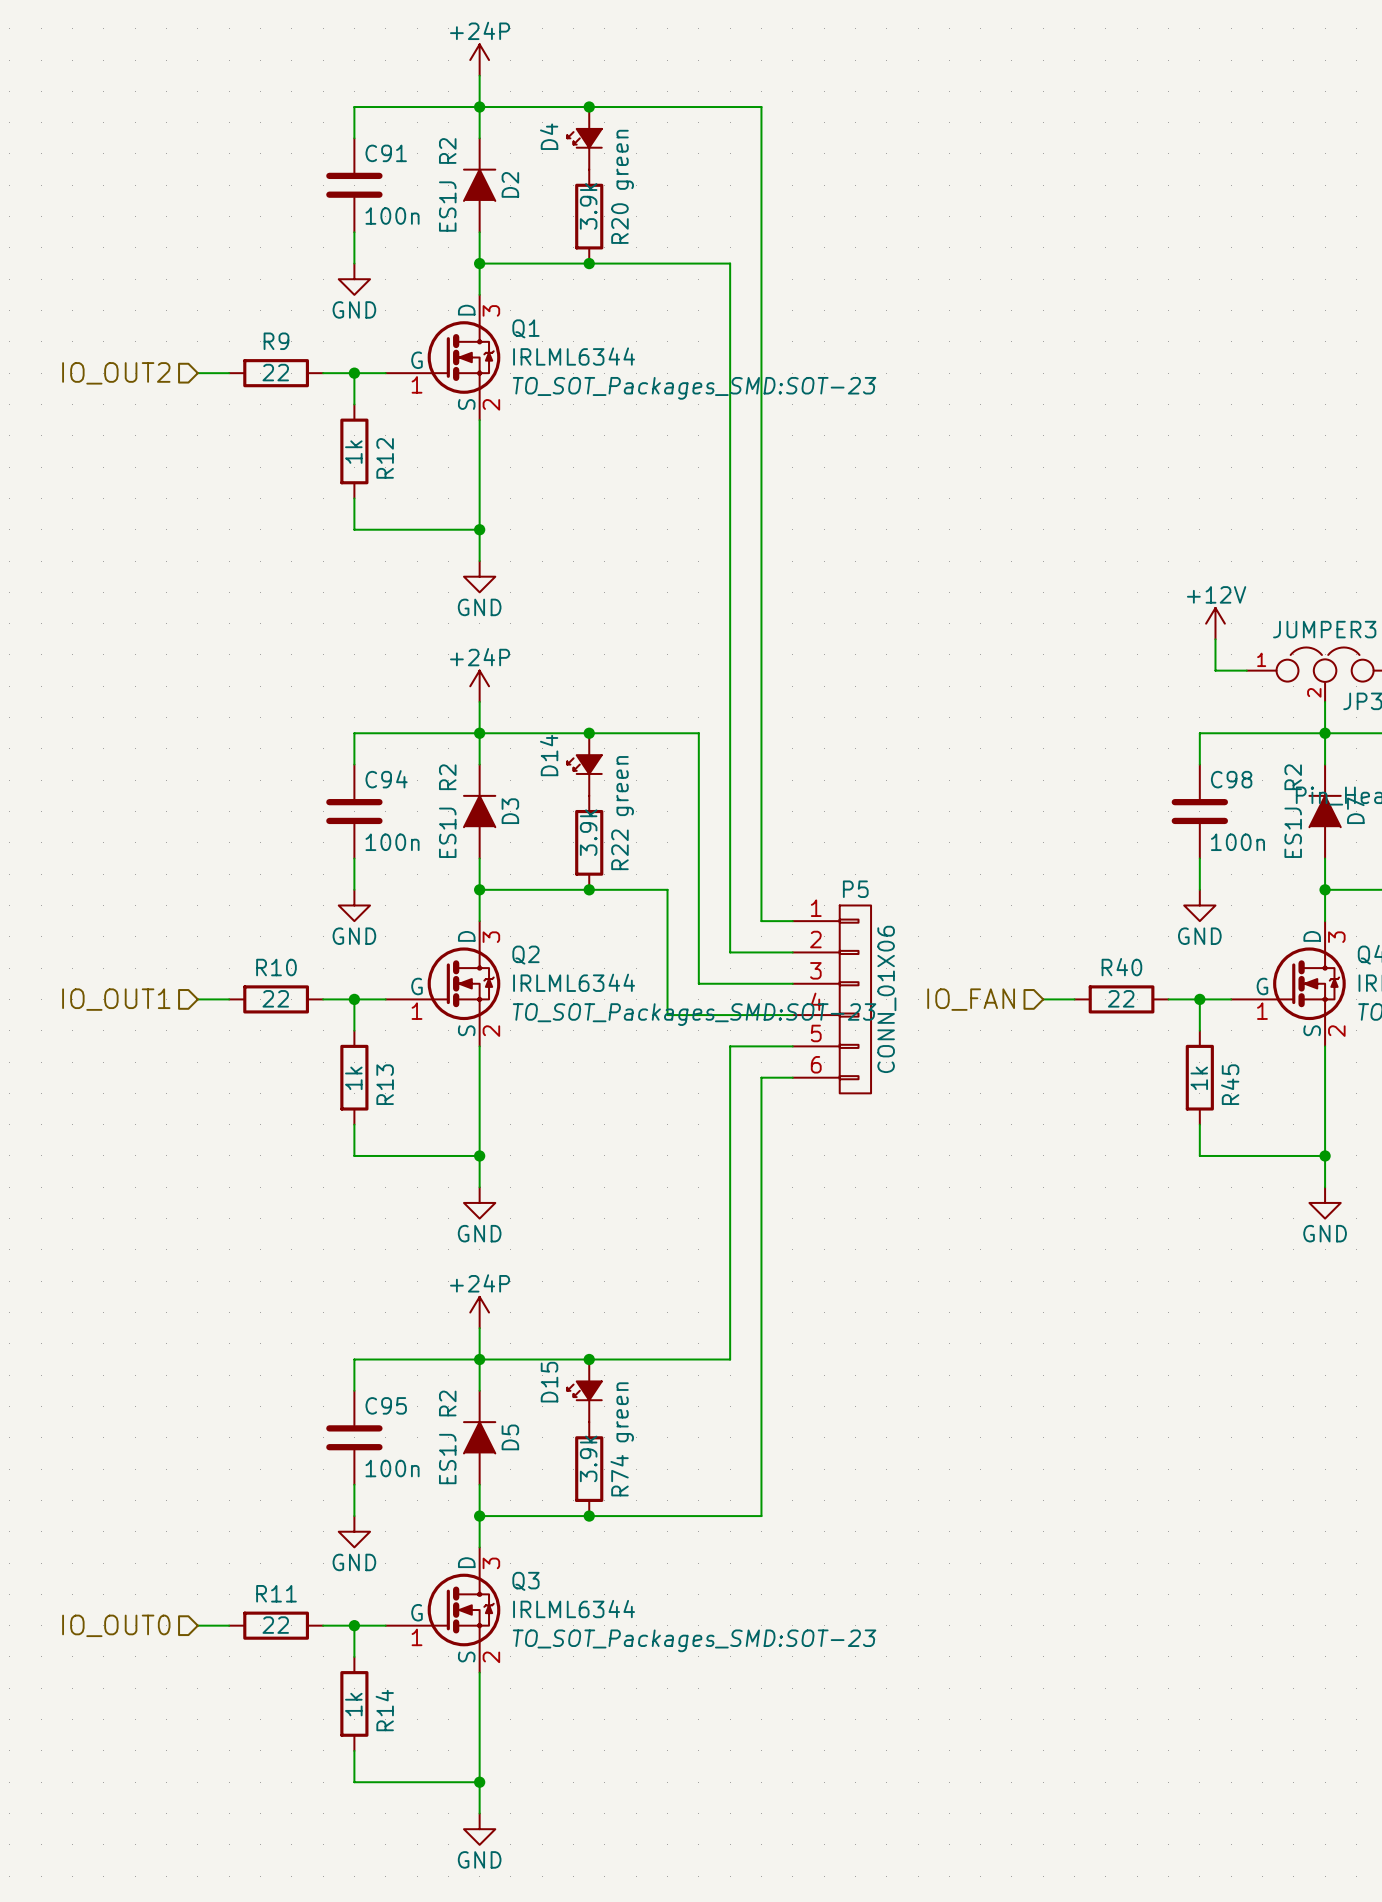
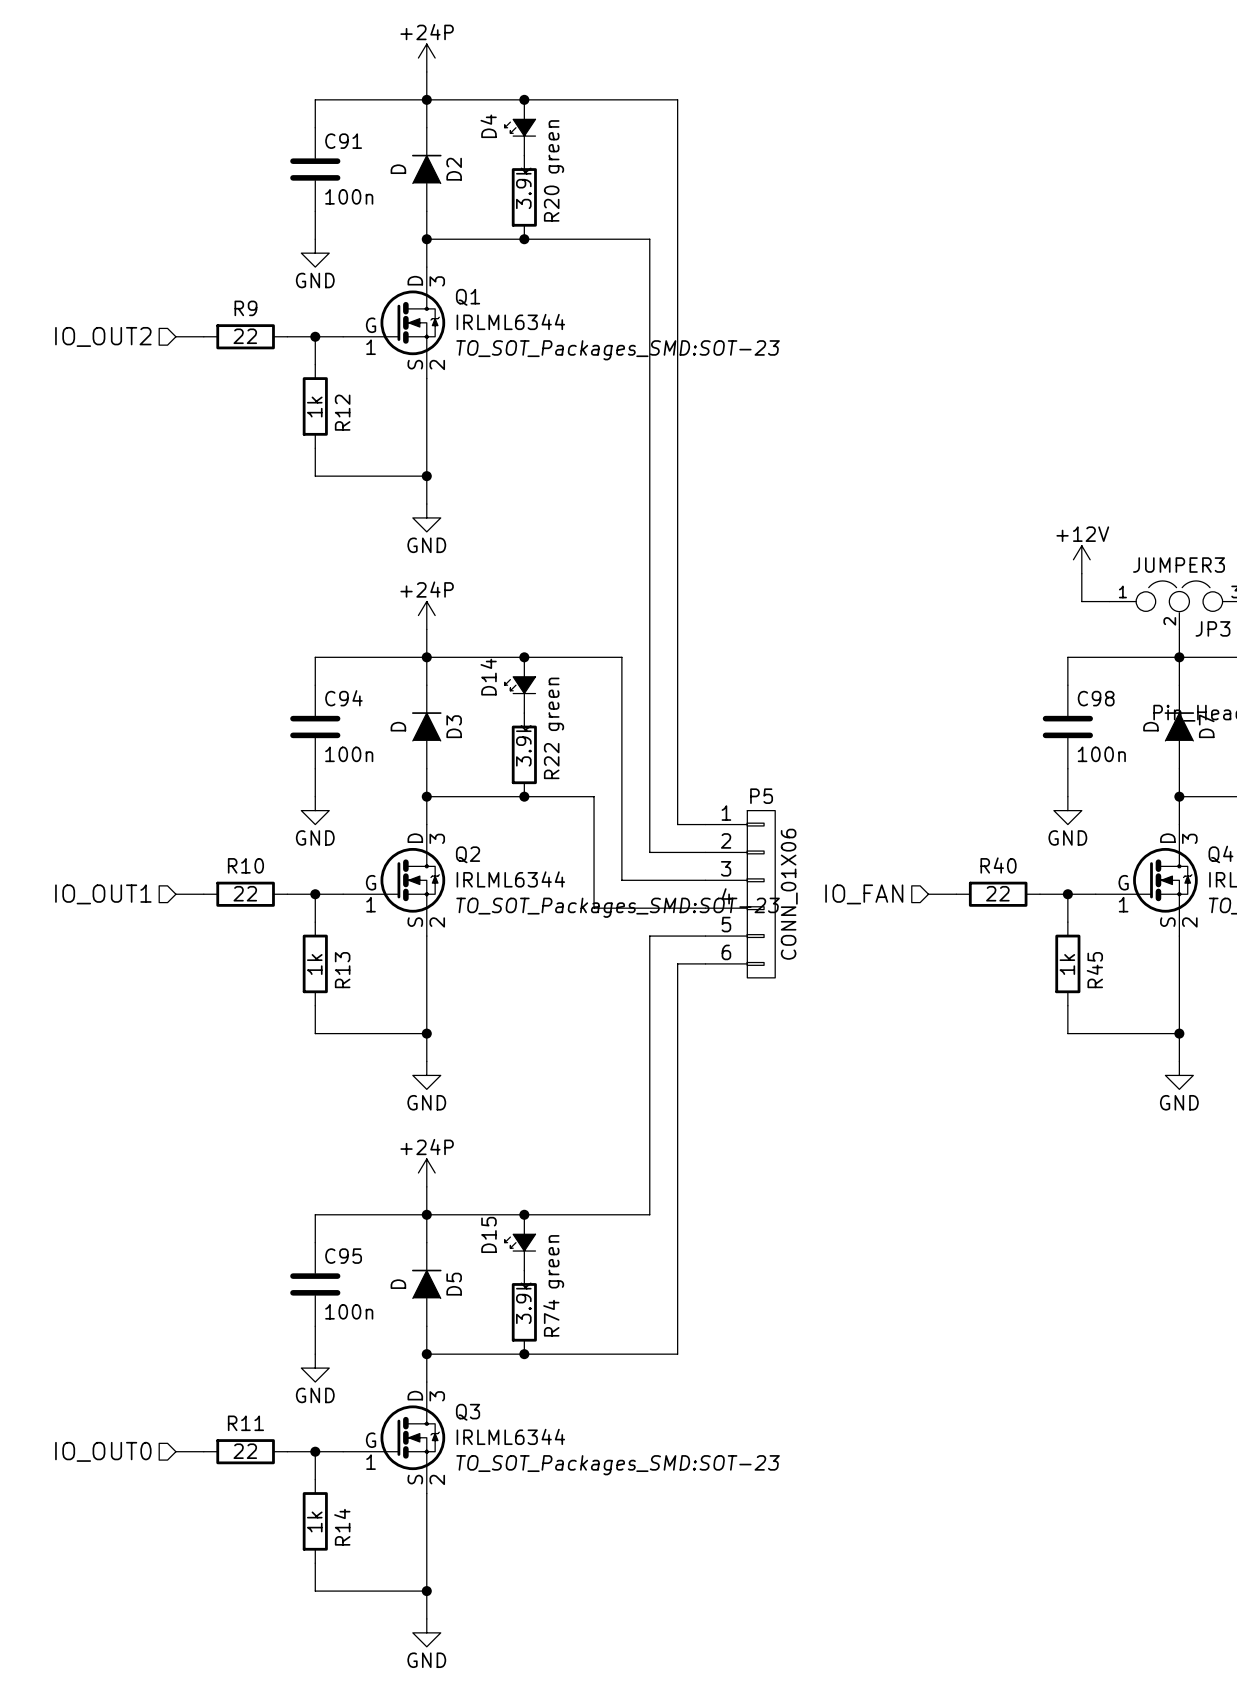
D2 value: ES1J R2 (447, 184) -> D (398, 169)
D3 value: ES1J R2 (447, 811) -> D (398, 726)
D7 value: ES1J R2 (1293, 811) -> D (1150, 726)
D5 value: ES1J R2 (447, 1437) -> D (398, 1284)

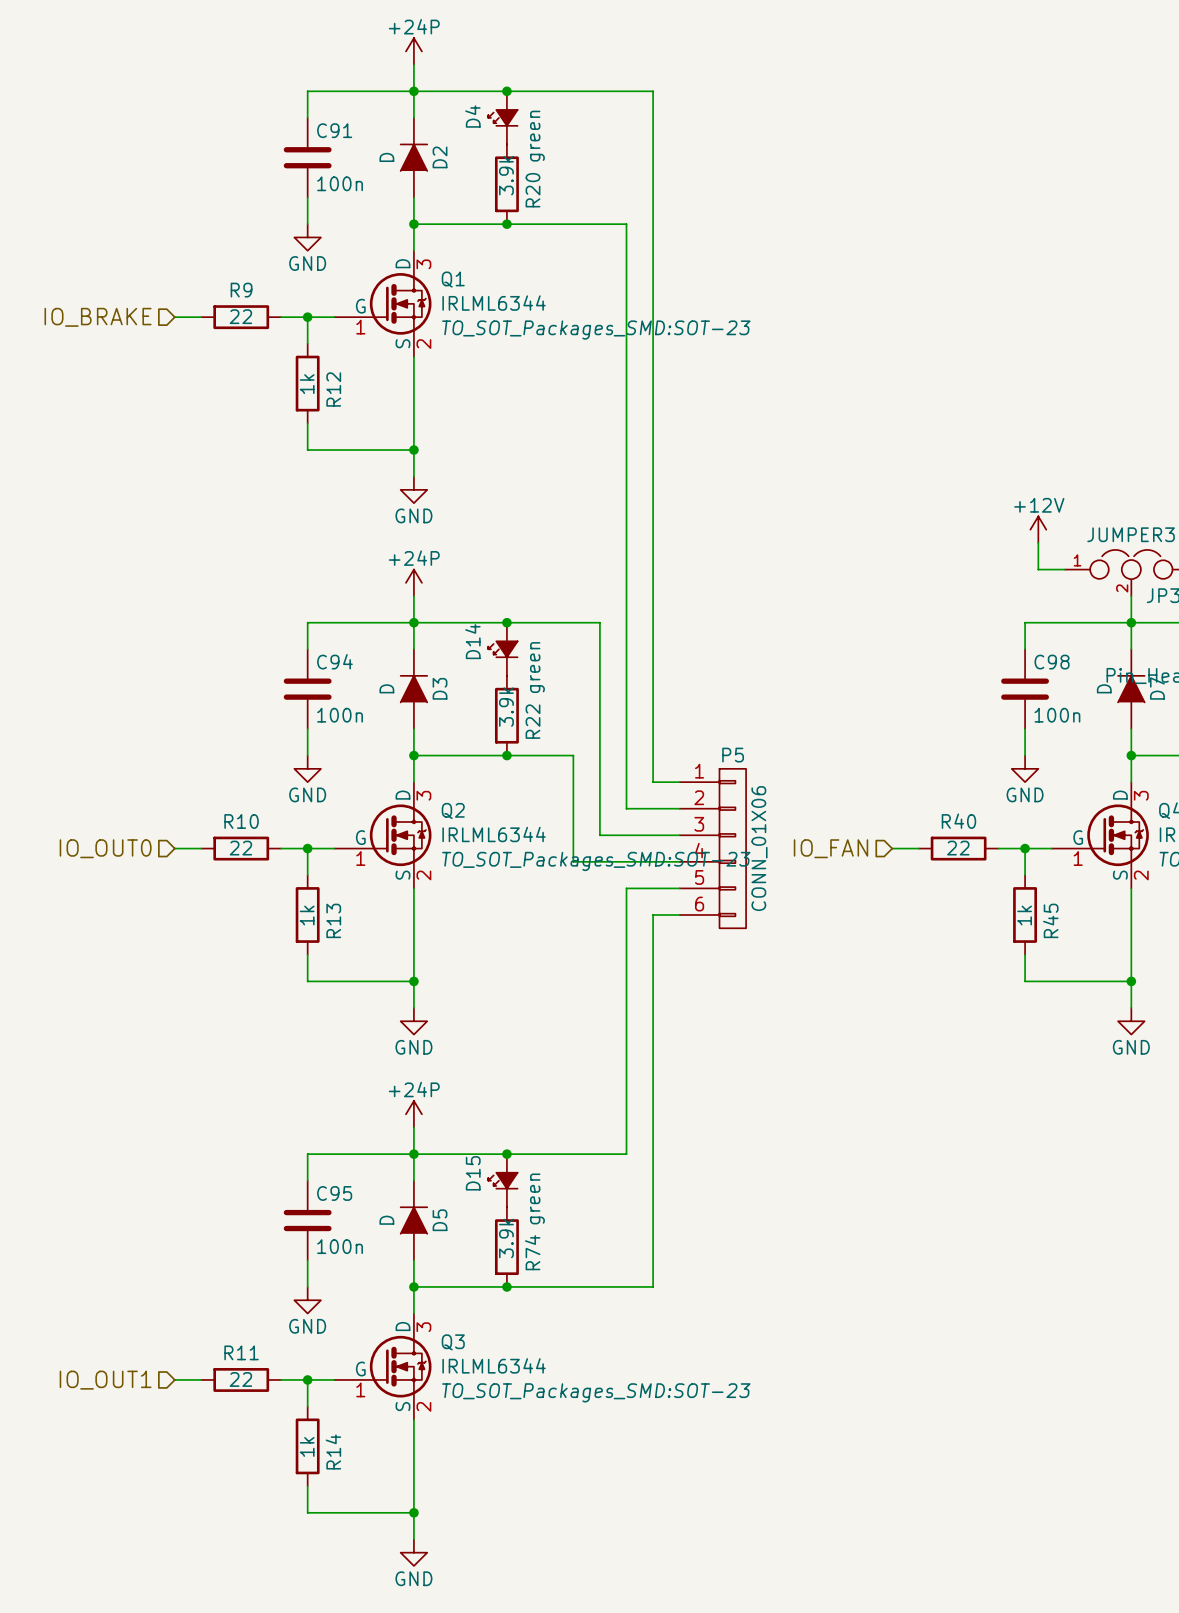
hierarchical label: IO_OUT2 (103, 336) -> IO_BRAKE (98, 317)
hierarchical label: IO_OUT1 (103, 894) -> IO_OUT0 (105, 848)
hierarchical label: IO_OUT0 (103, 1451) -> IO_OUT1 (105, 1380)

